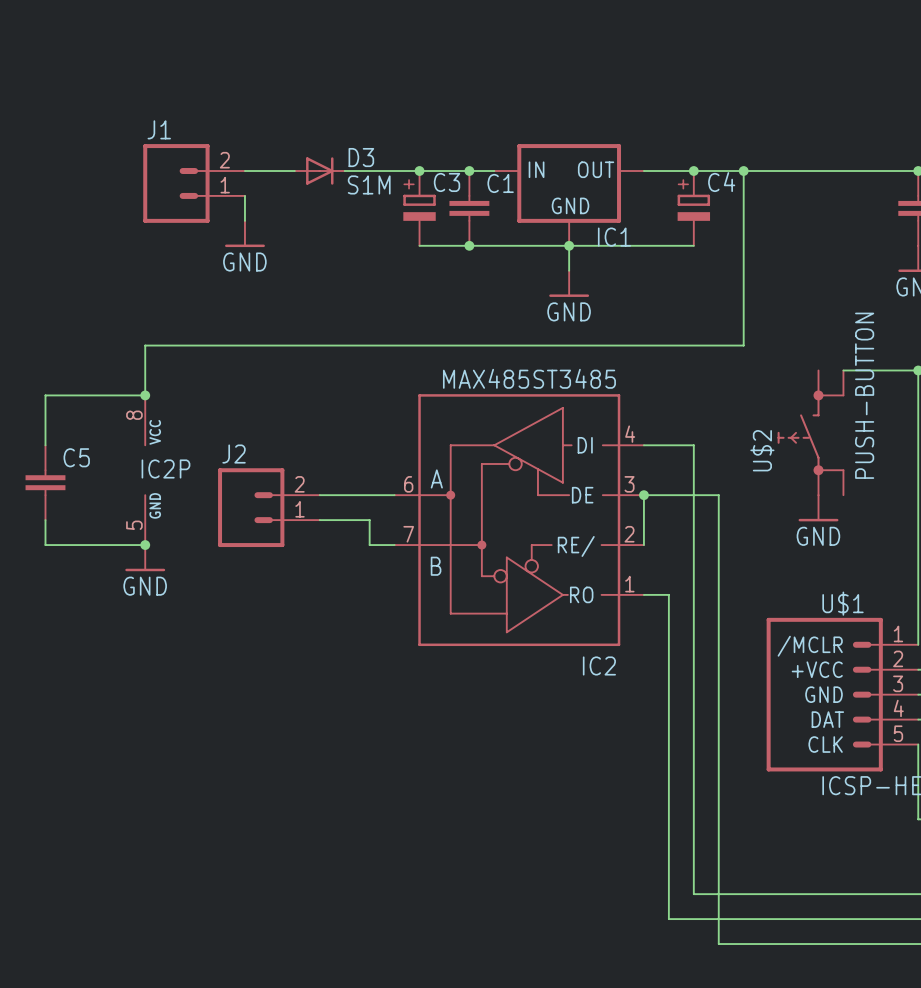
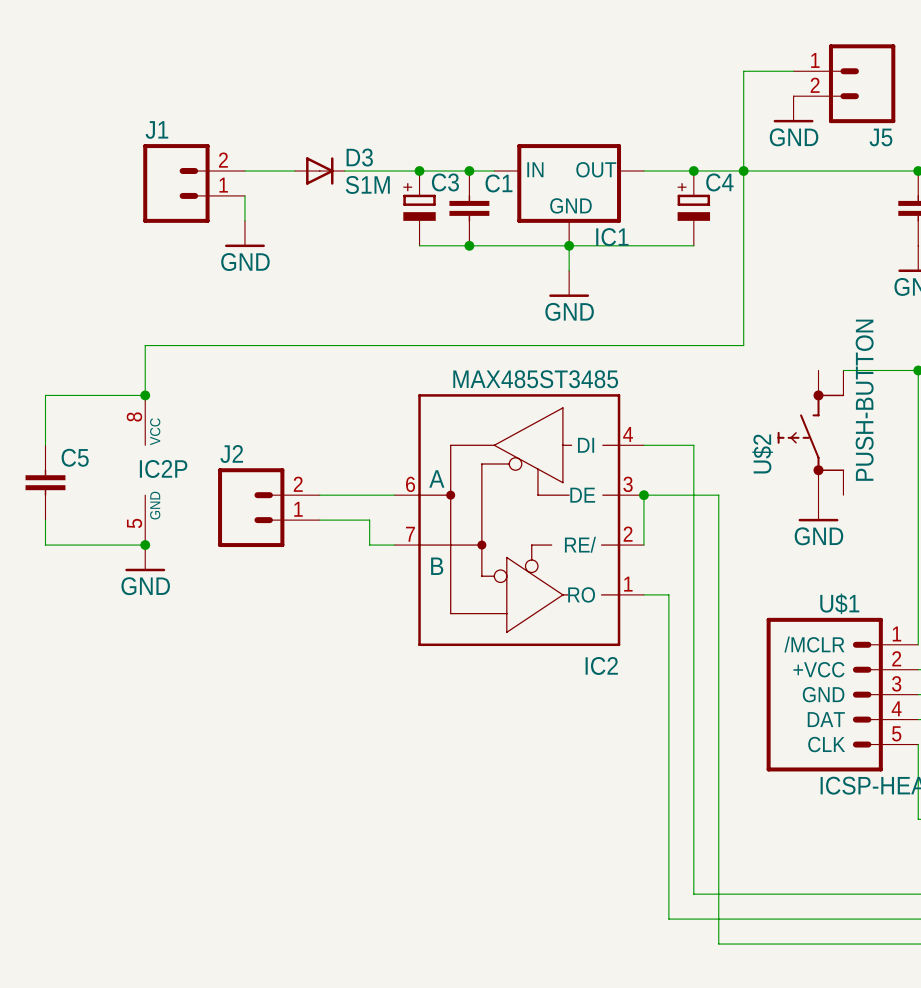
wire: none -> (793, 71) (743, 71) (743, 171)
J5: none -> (844, 83)
power symbol: none -> GND (793, 109)

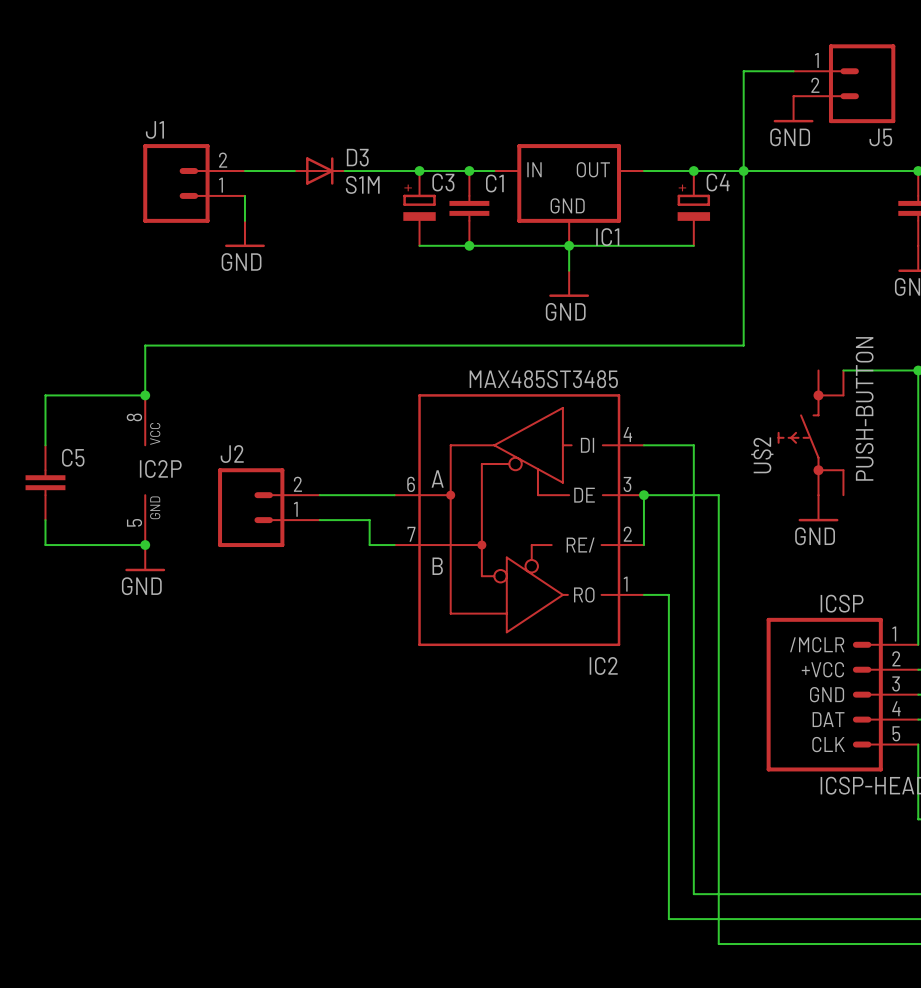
U$1 name: U$1 (839, 603) -> ICSP (842, 603)

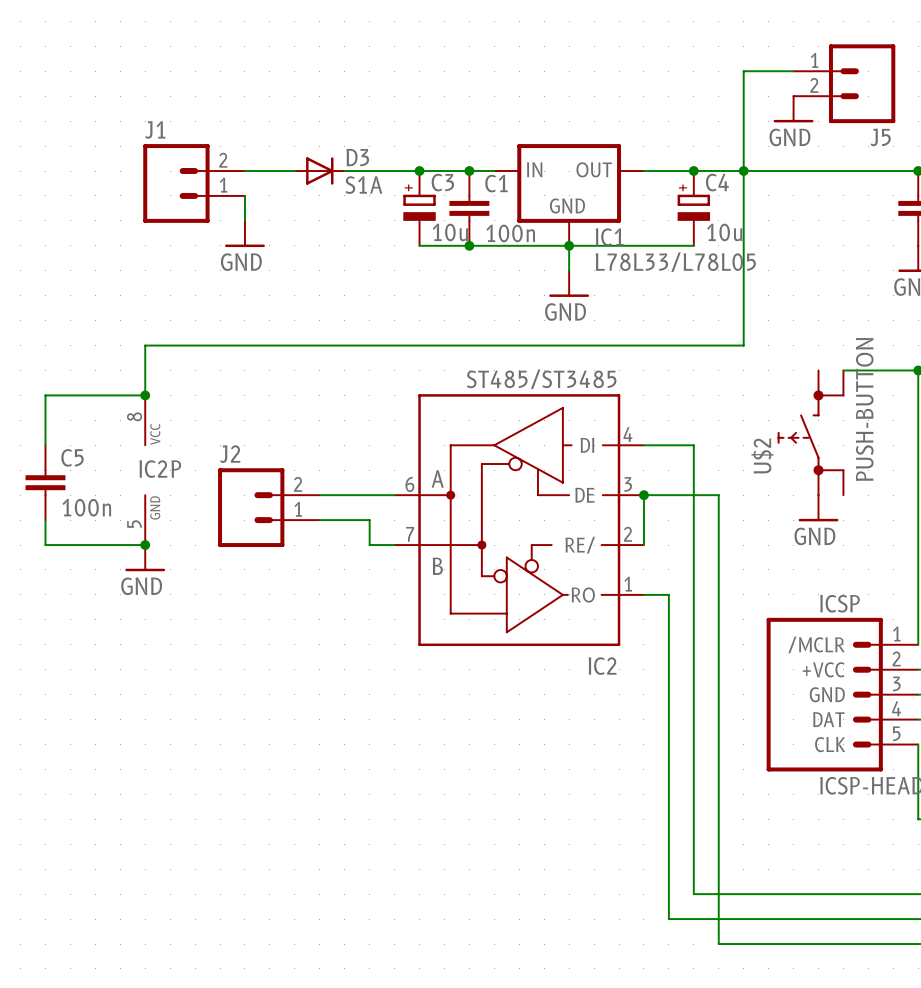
D3 value: S1M (362, 184) -> S1A (363, 185)
C3 value: none -> 10u (450, 232)
C4 value: none -> 10u (724, 232)
C1 value: none -> 100n (510, 233)
IC1 value: none -> L78L33/L78L05 (675, 262)
IC2 value: MAX485ST3485 (543, 379) -> ST485/ST3485 (541, 379)
C5 value: none -> 100n (86, 507)

